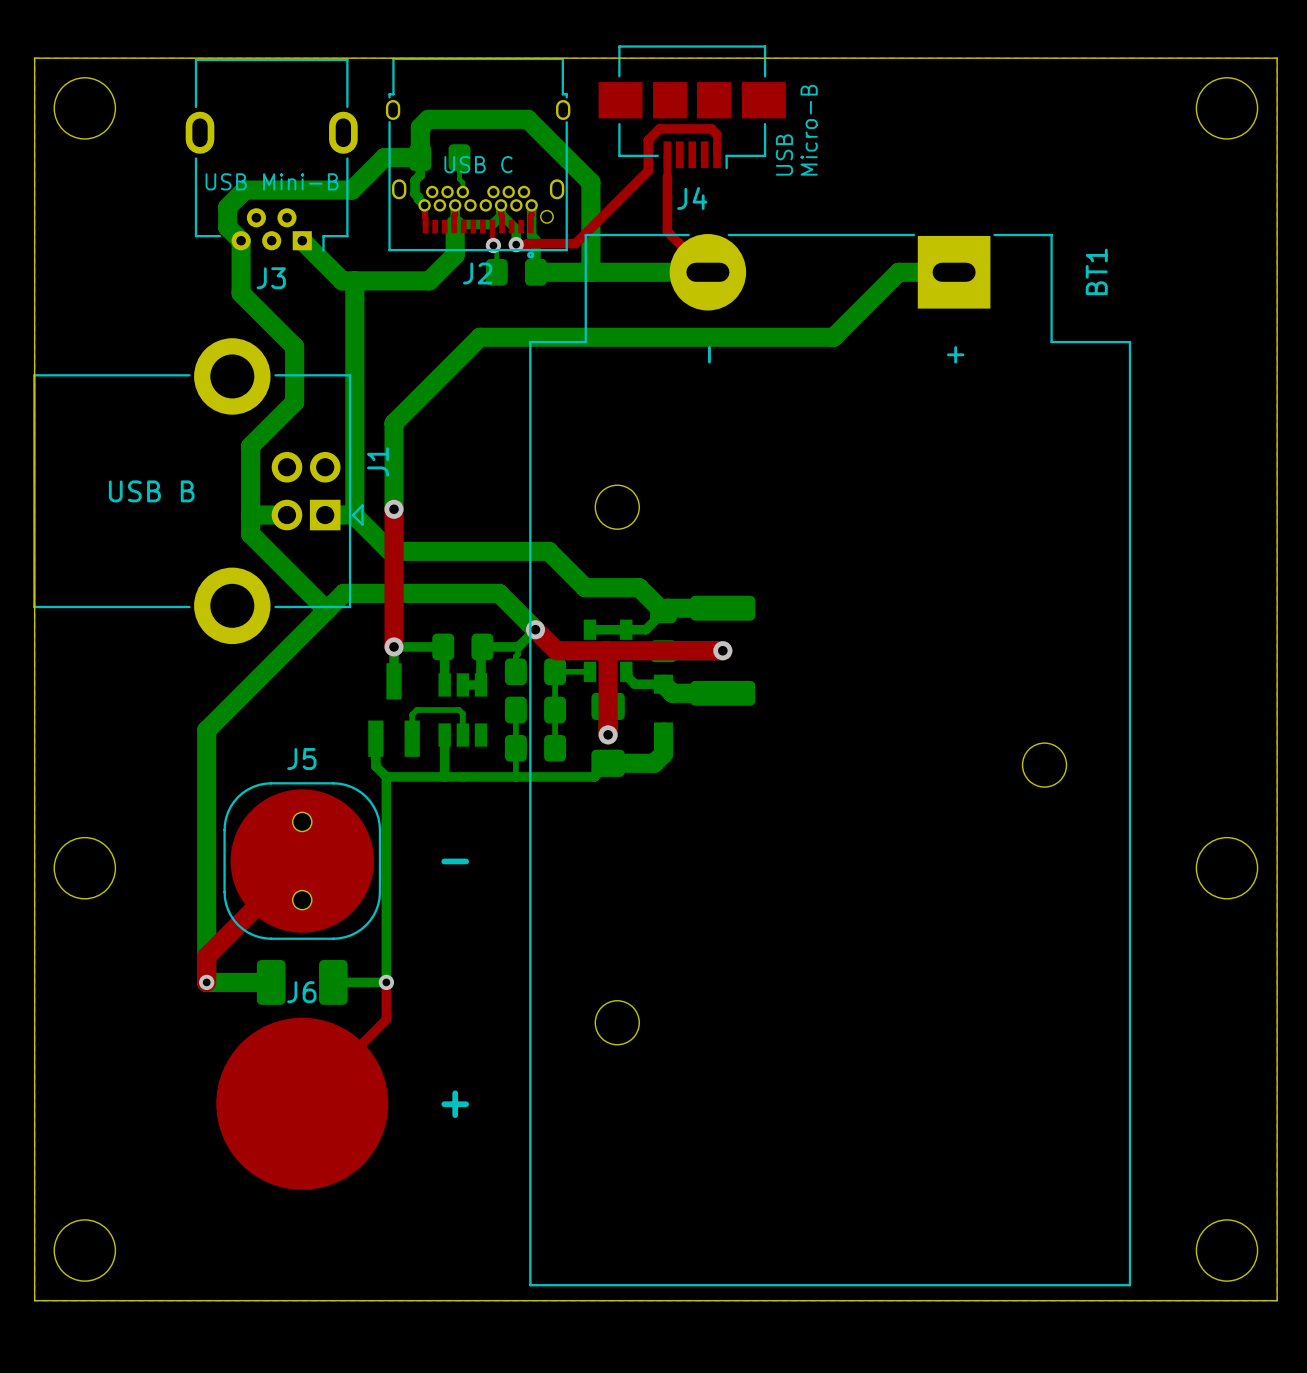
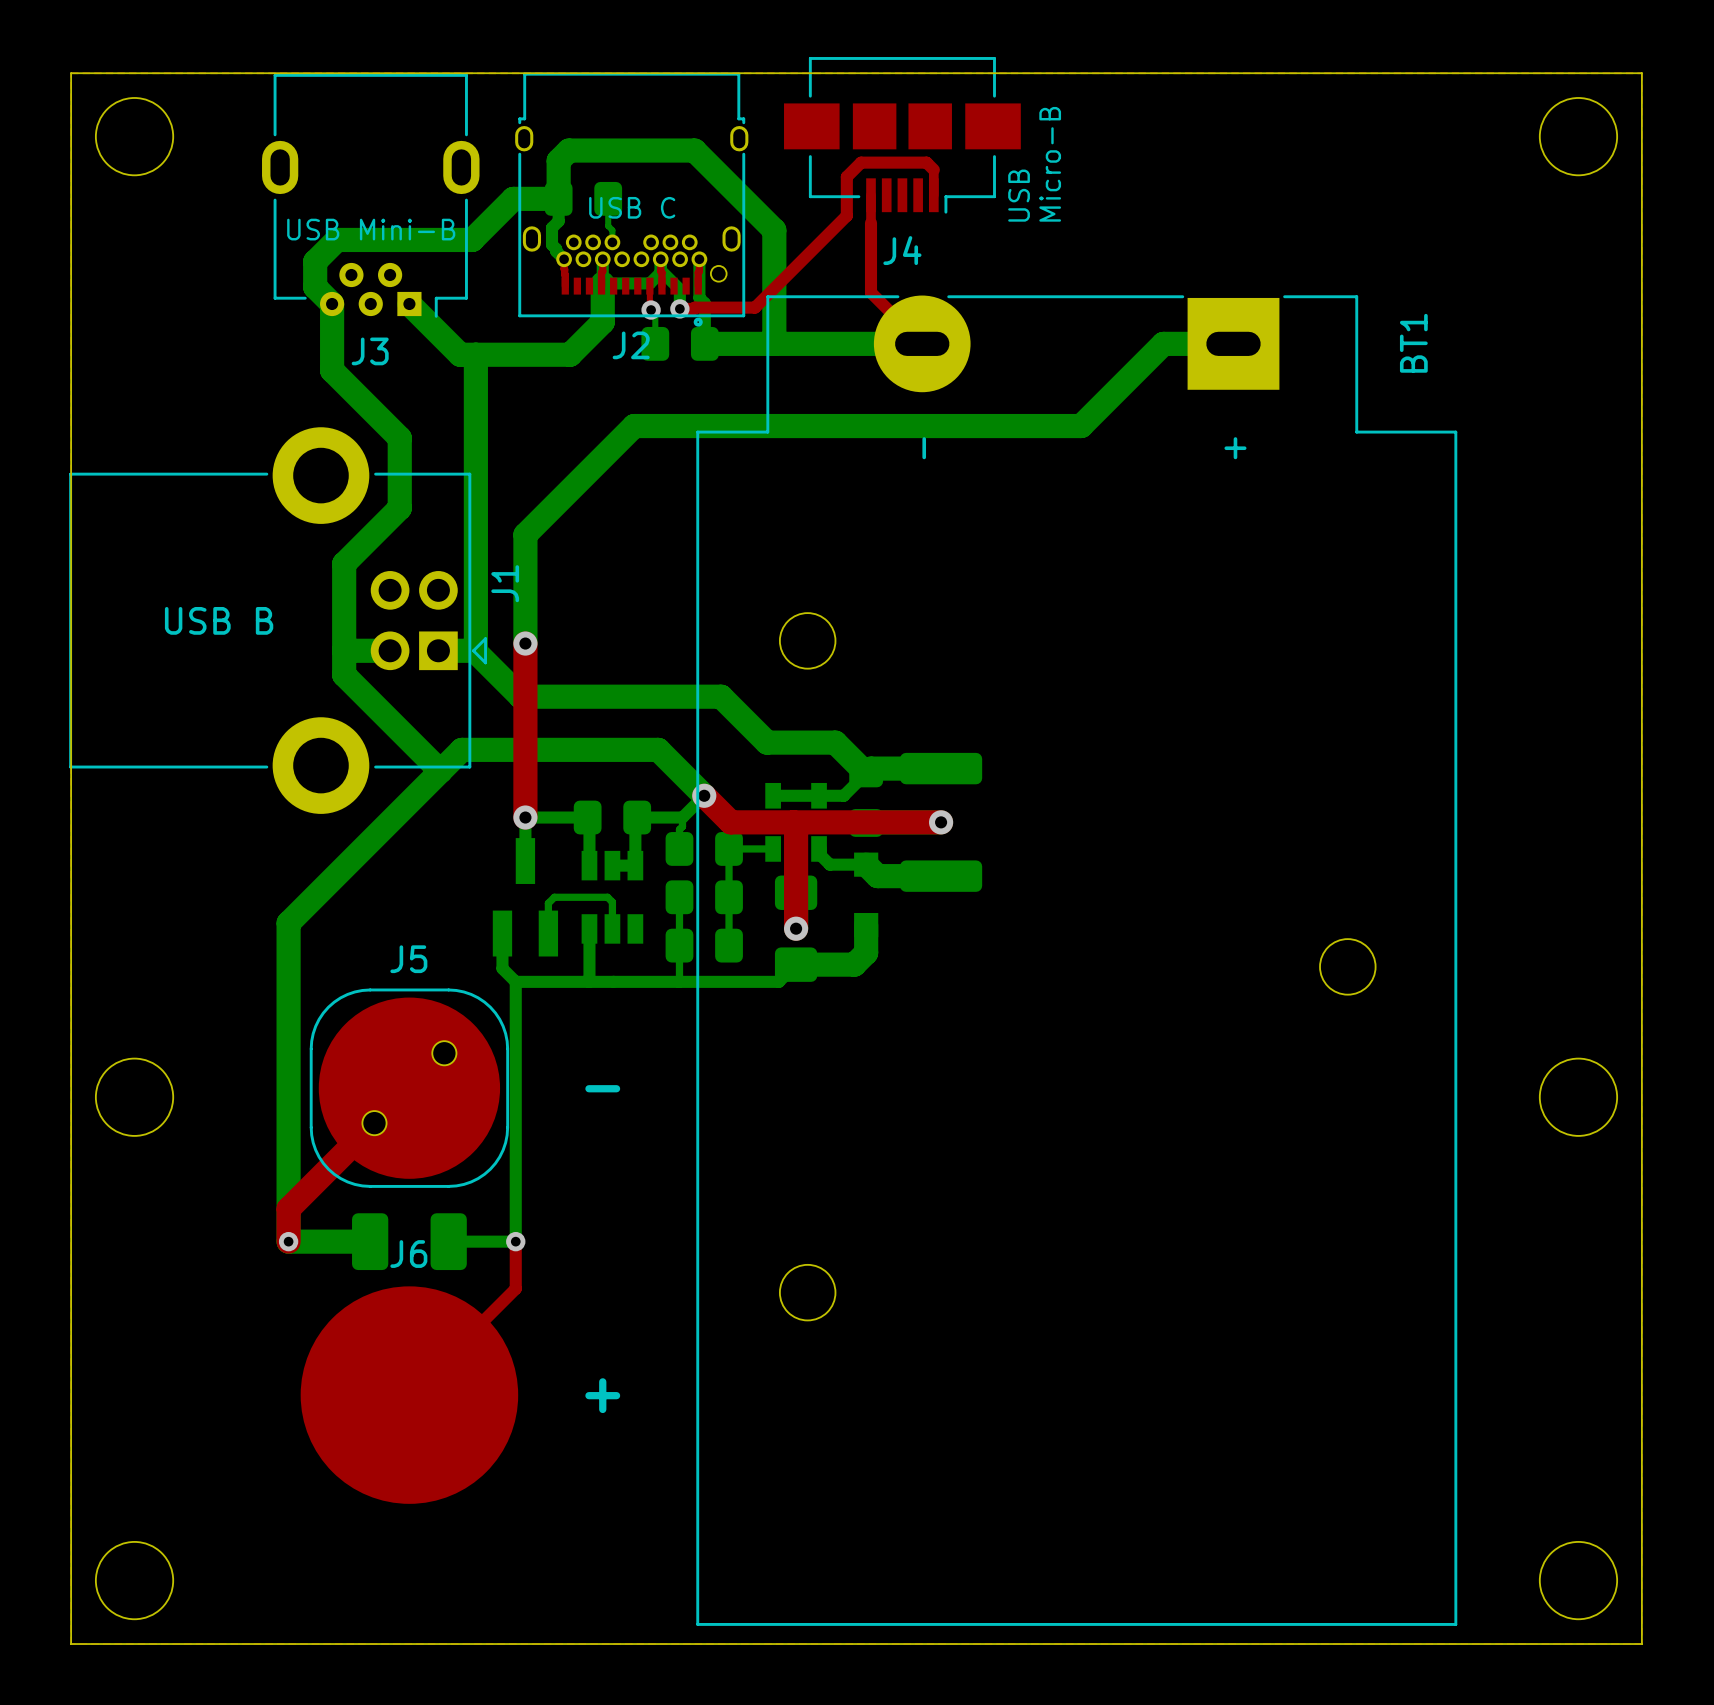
J5 footprint: [223, 782, 382, 940] -> [309, 988, 510, 1188]

